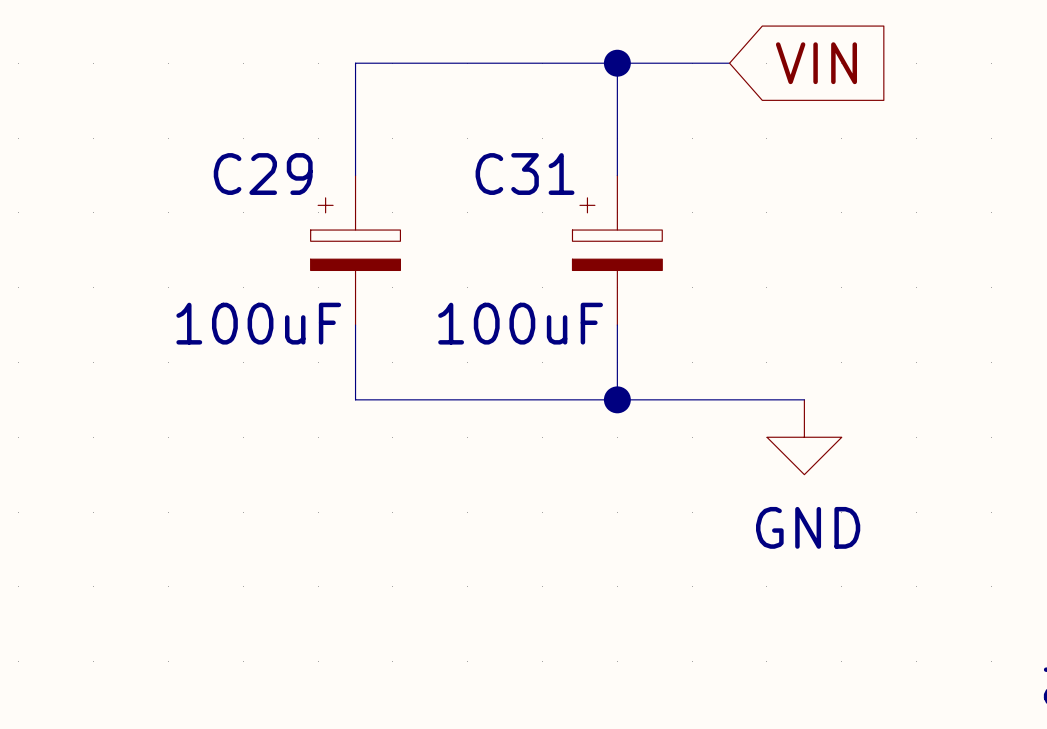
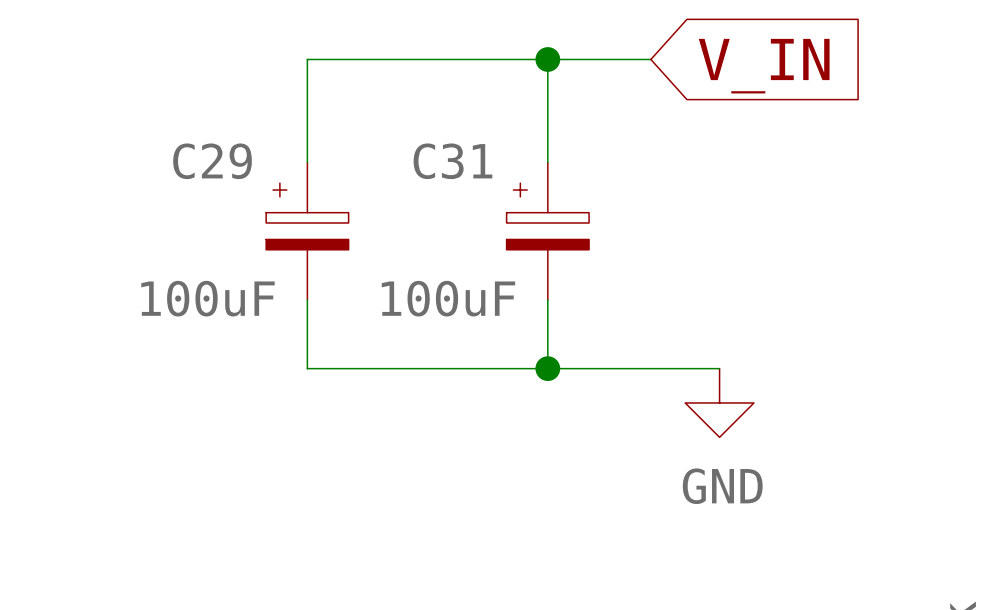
global label: VIN (816, 63) -> V_IN (764, 66)

